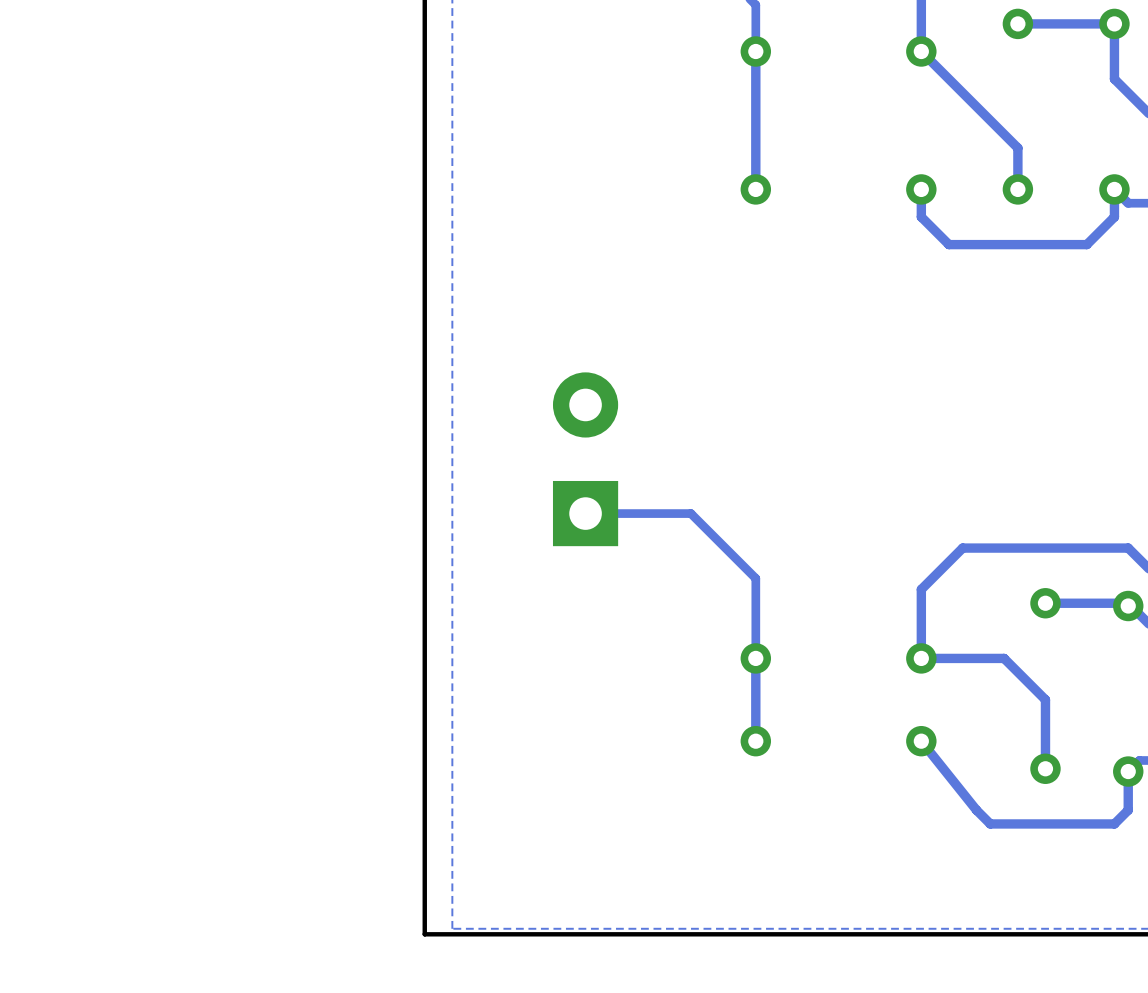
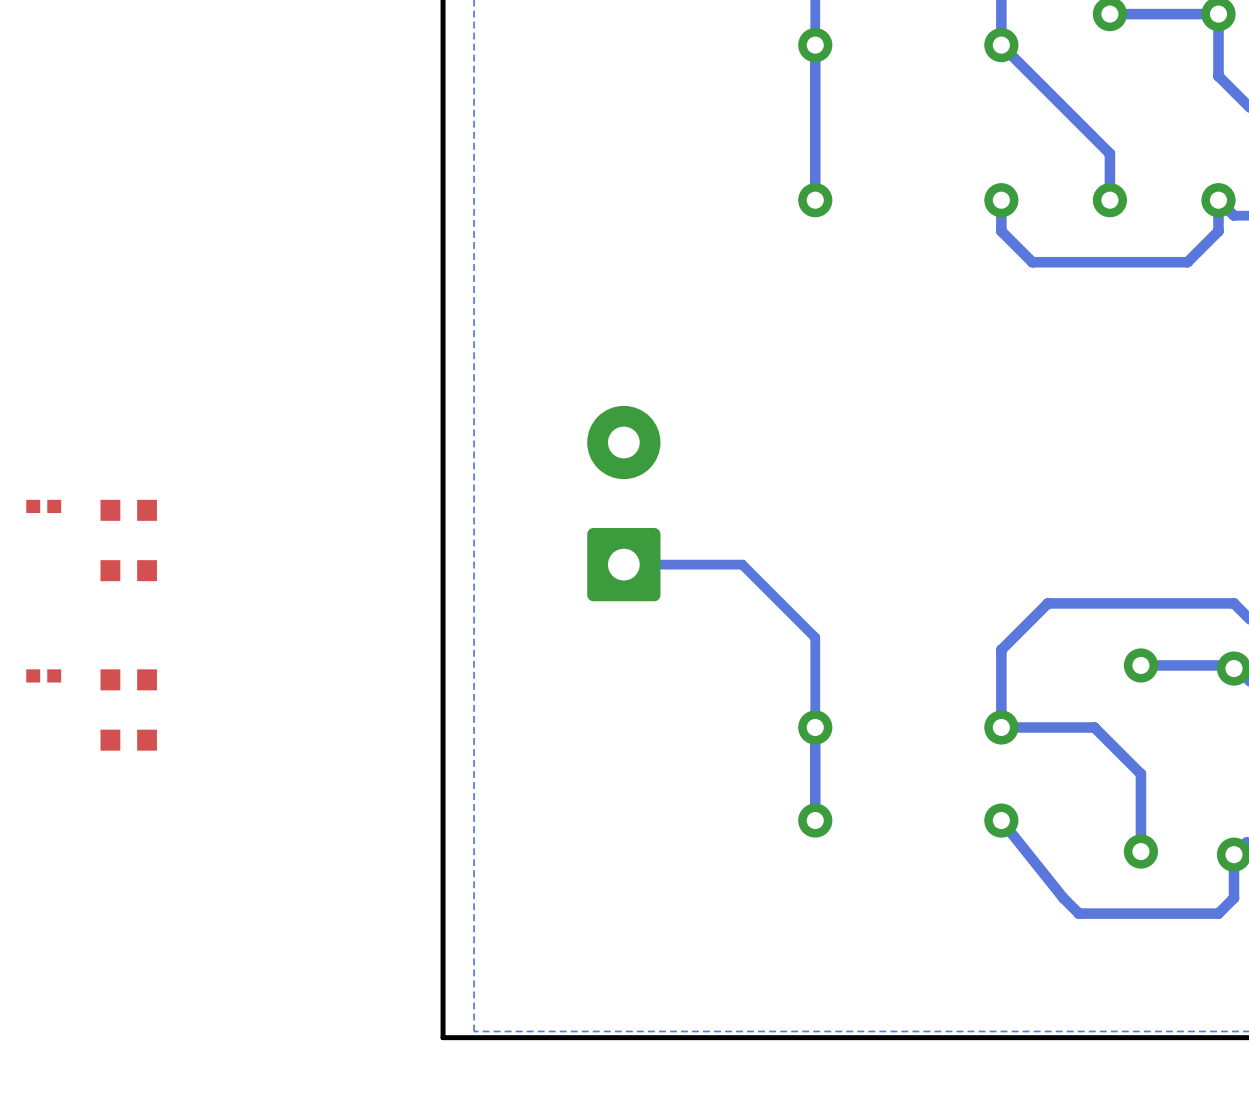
part footprint: [552, 372, 619, 547] -> [587, 405, 661, 602]
part: none -> (43, 506)
part: none -> (128, 510)
part: none -> (128, 570)
part: none -> (43, 675)
part: none -> (128, 679)
part: none -> (128, 740)

